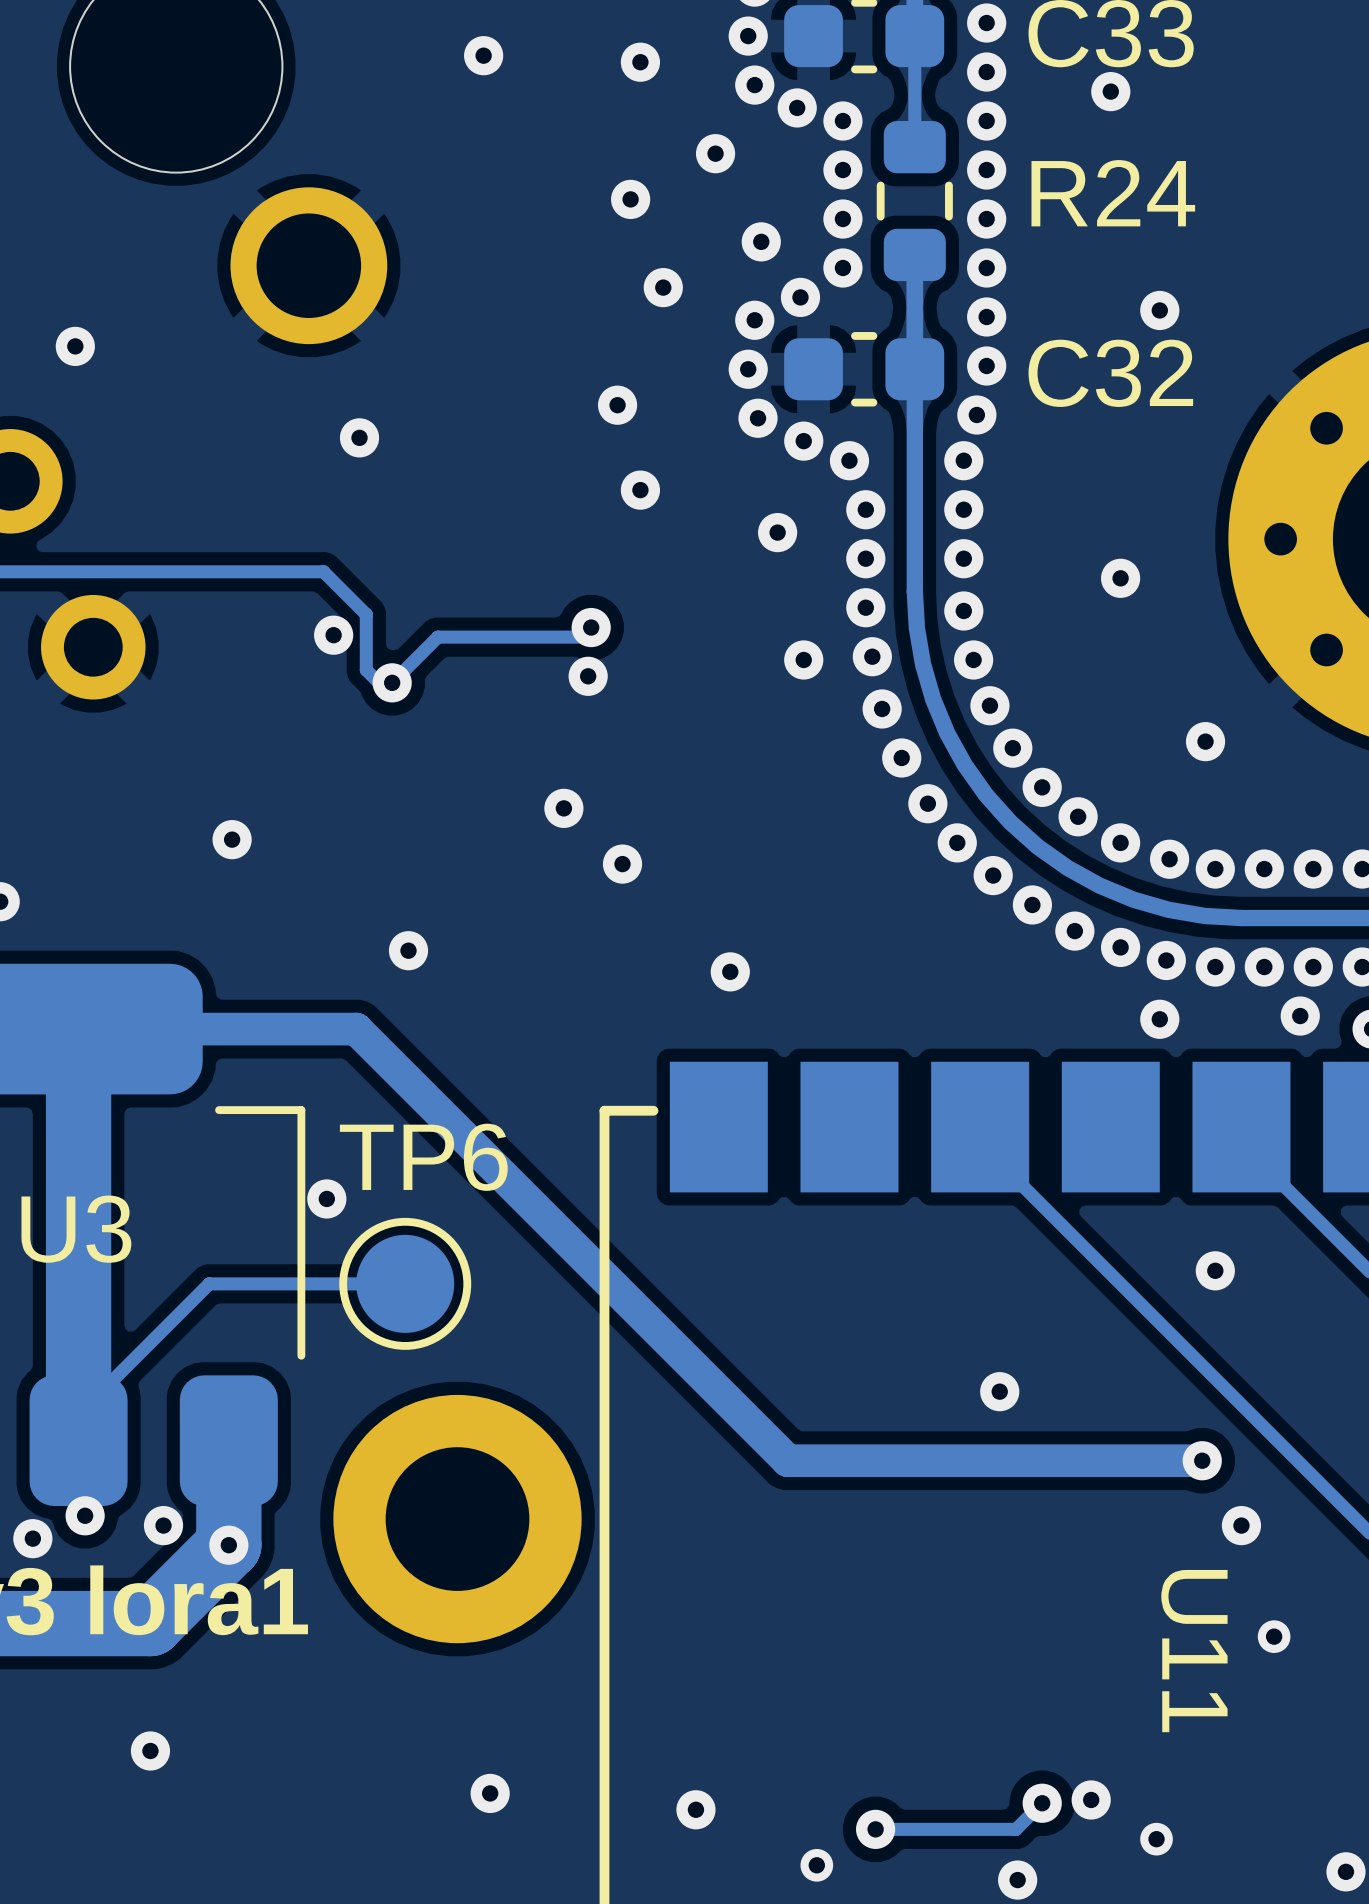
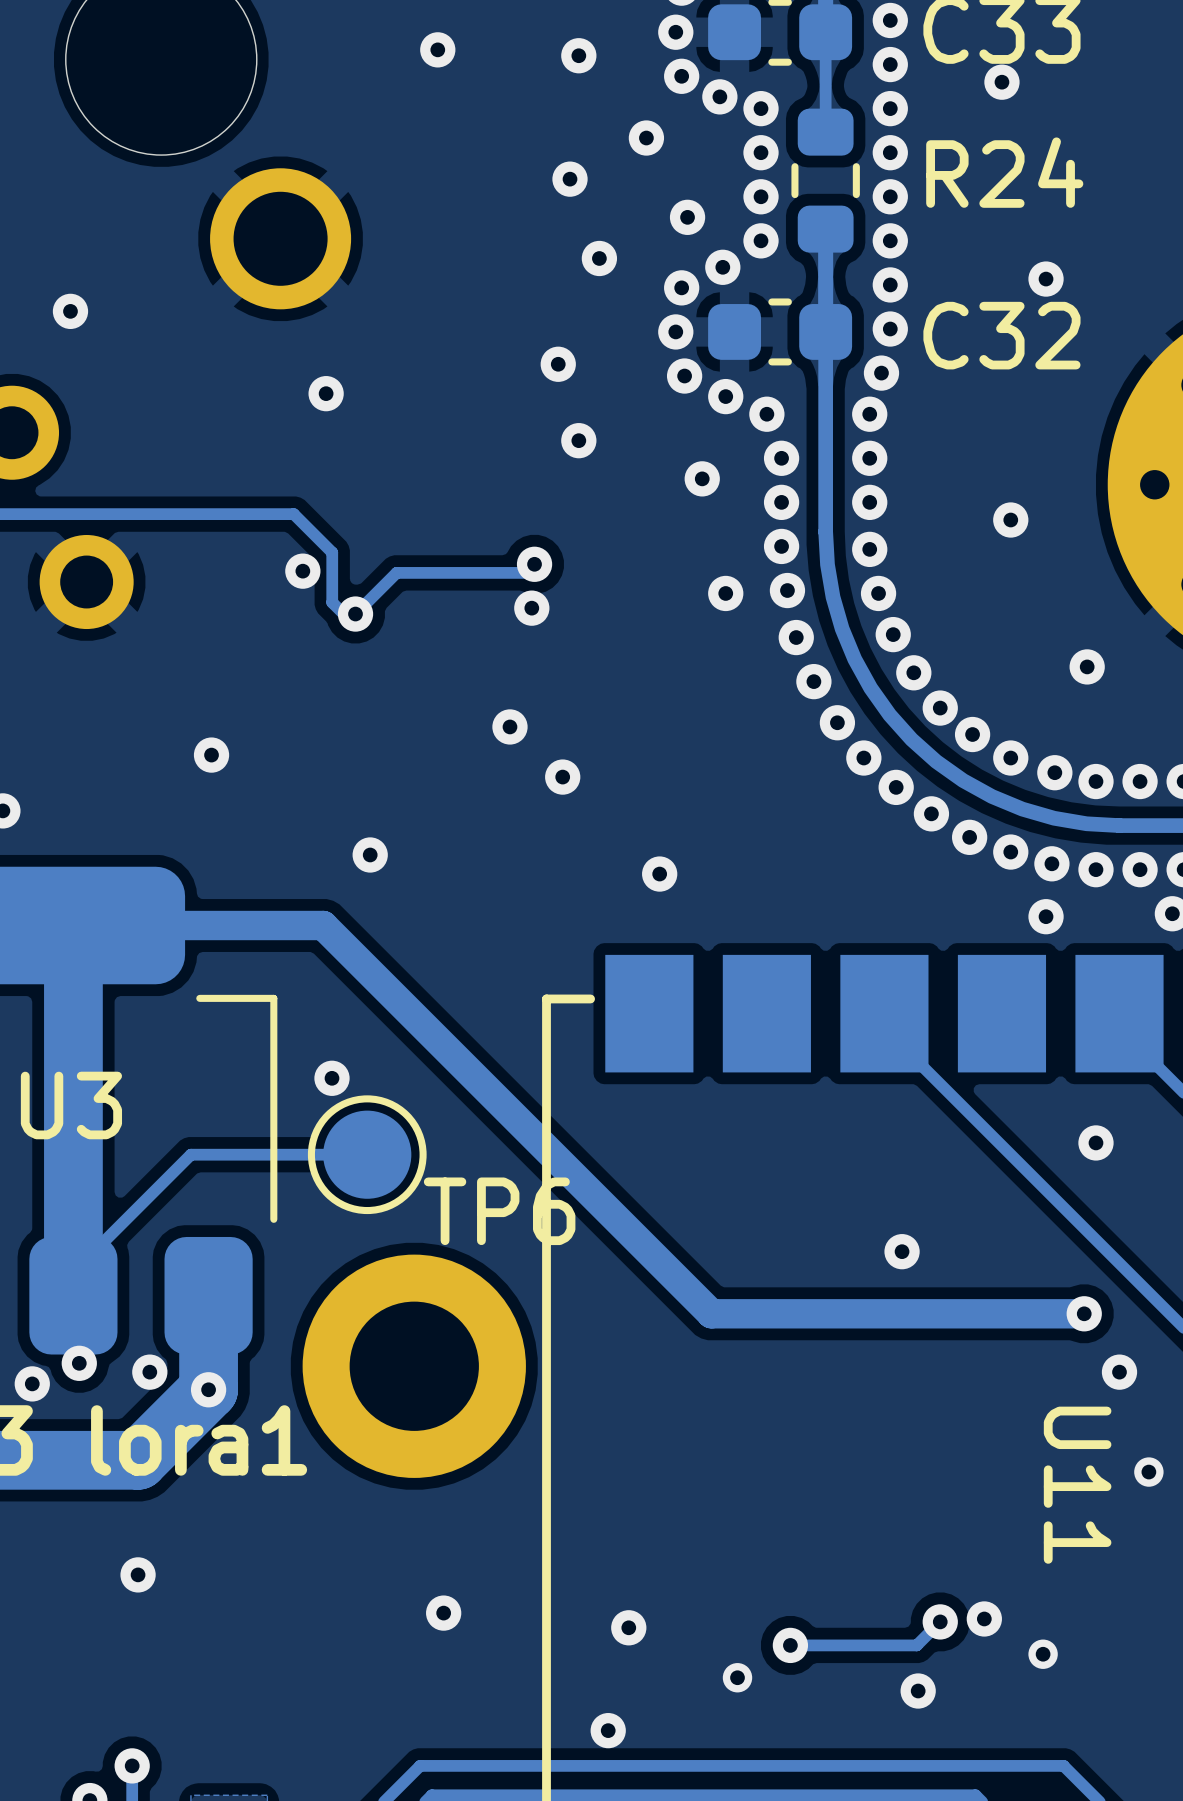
TP6 name position: TP6 (423, 1157) -> TP6 (499, 1211)
via position: (326, 1198) -> (332, 1078)

